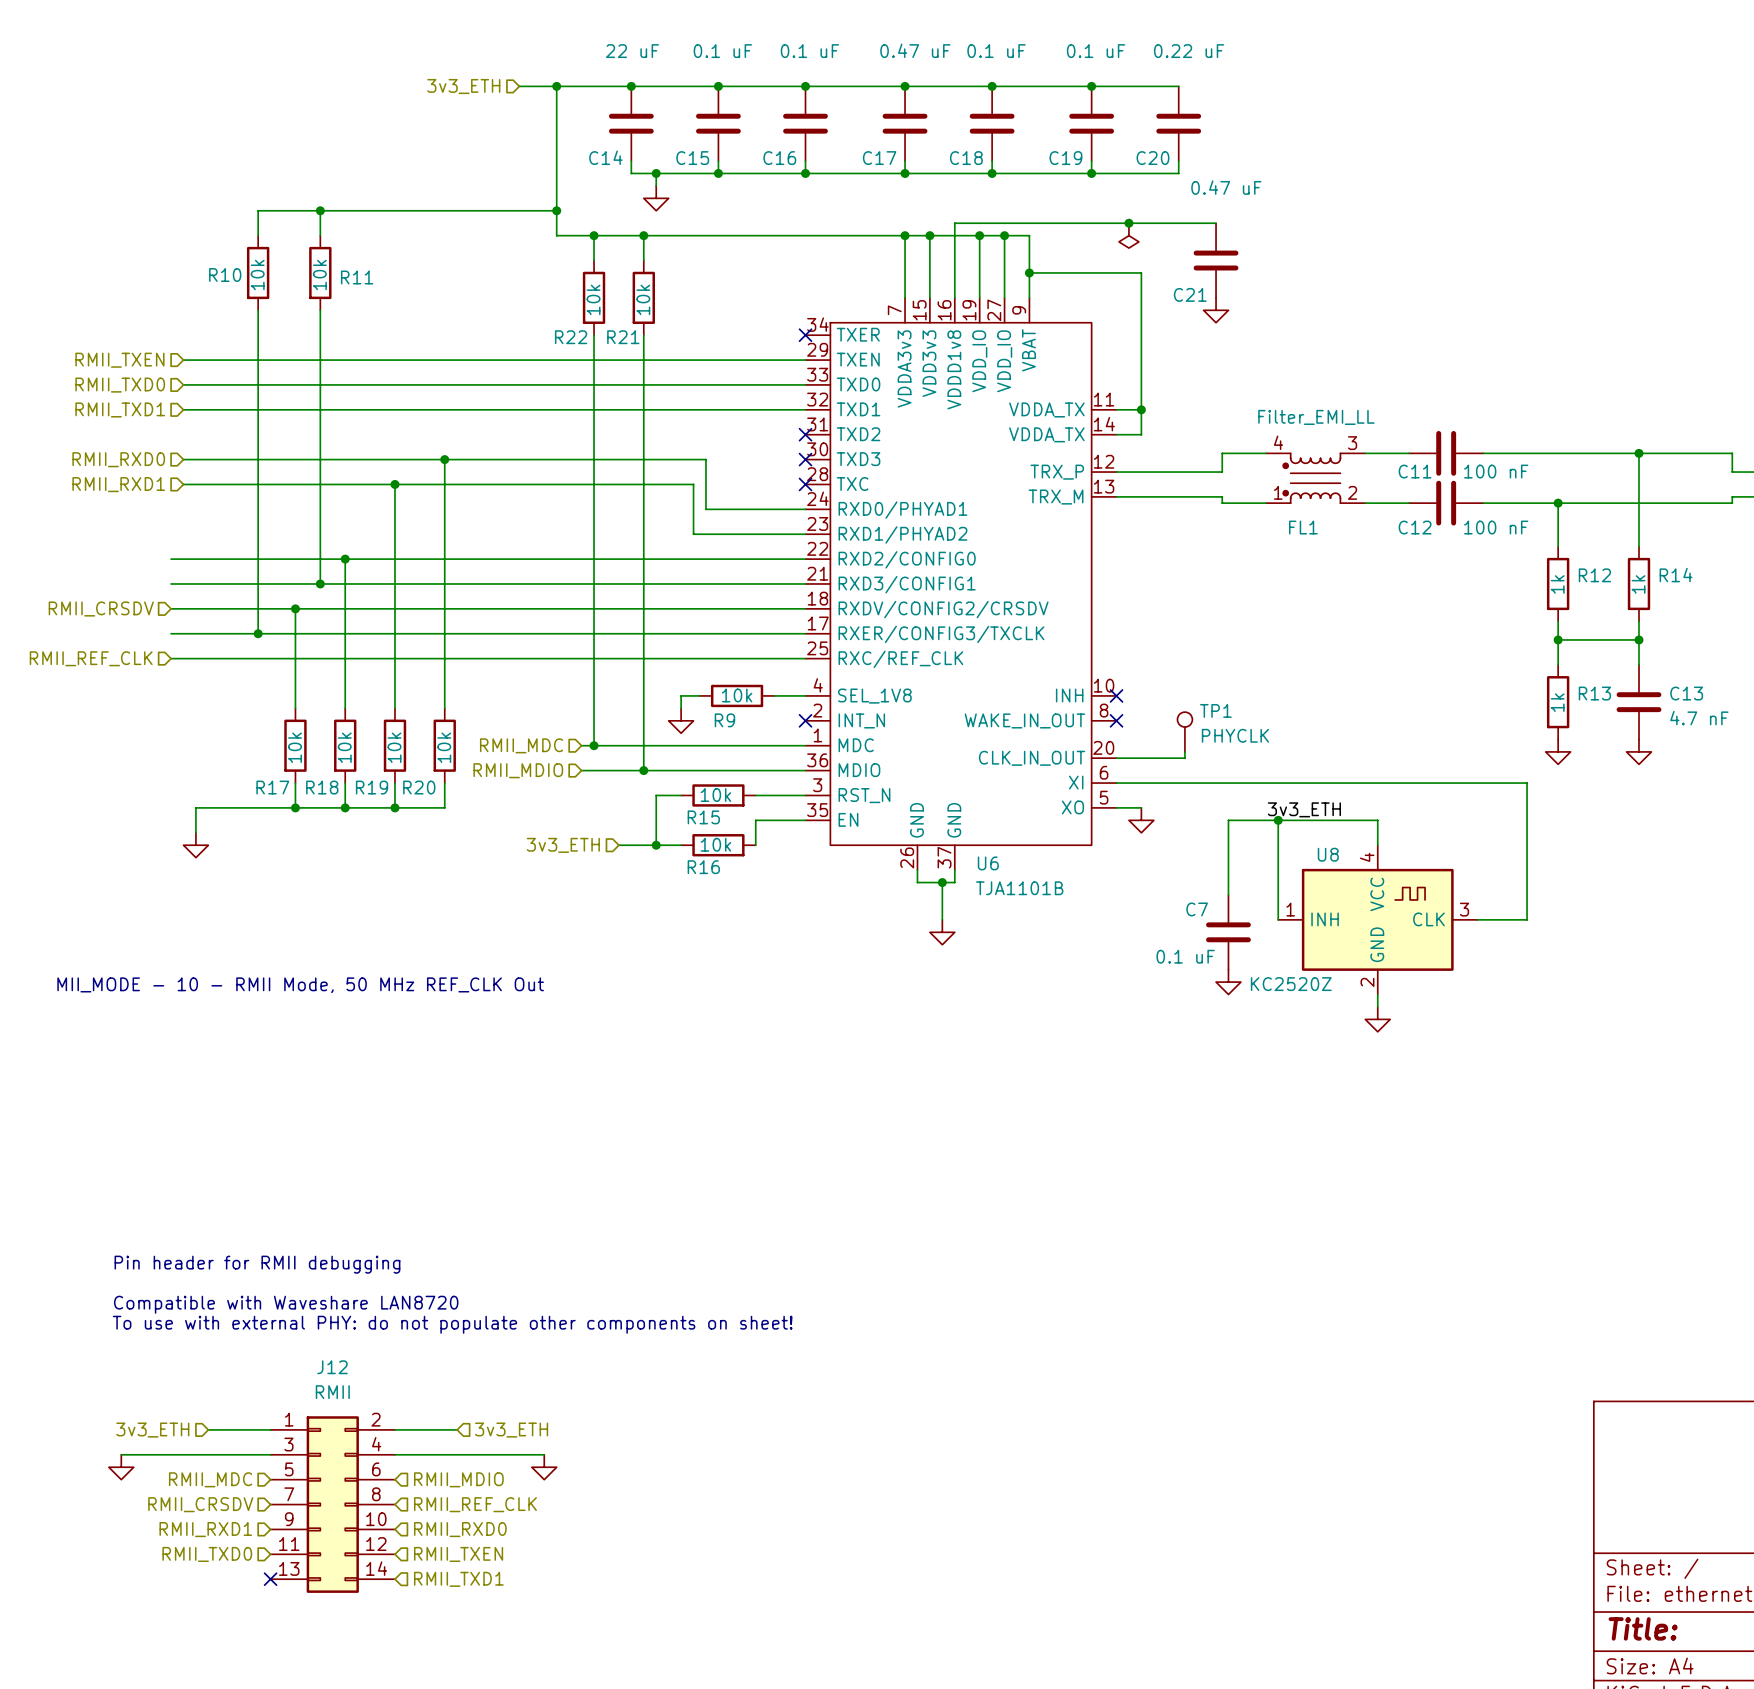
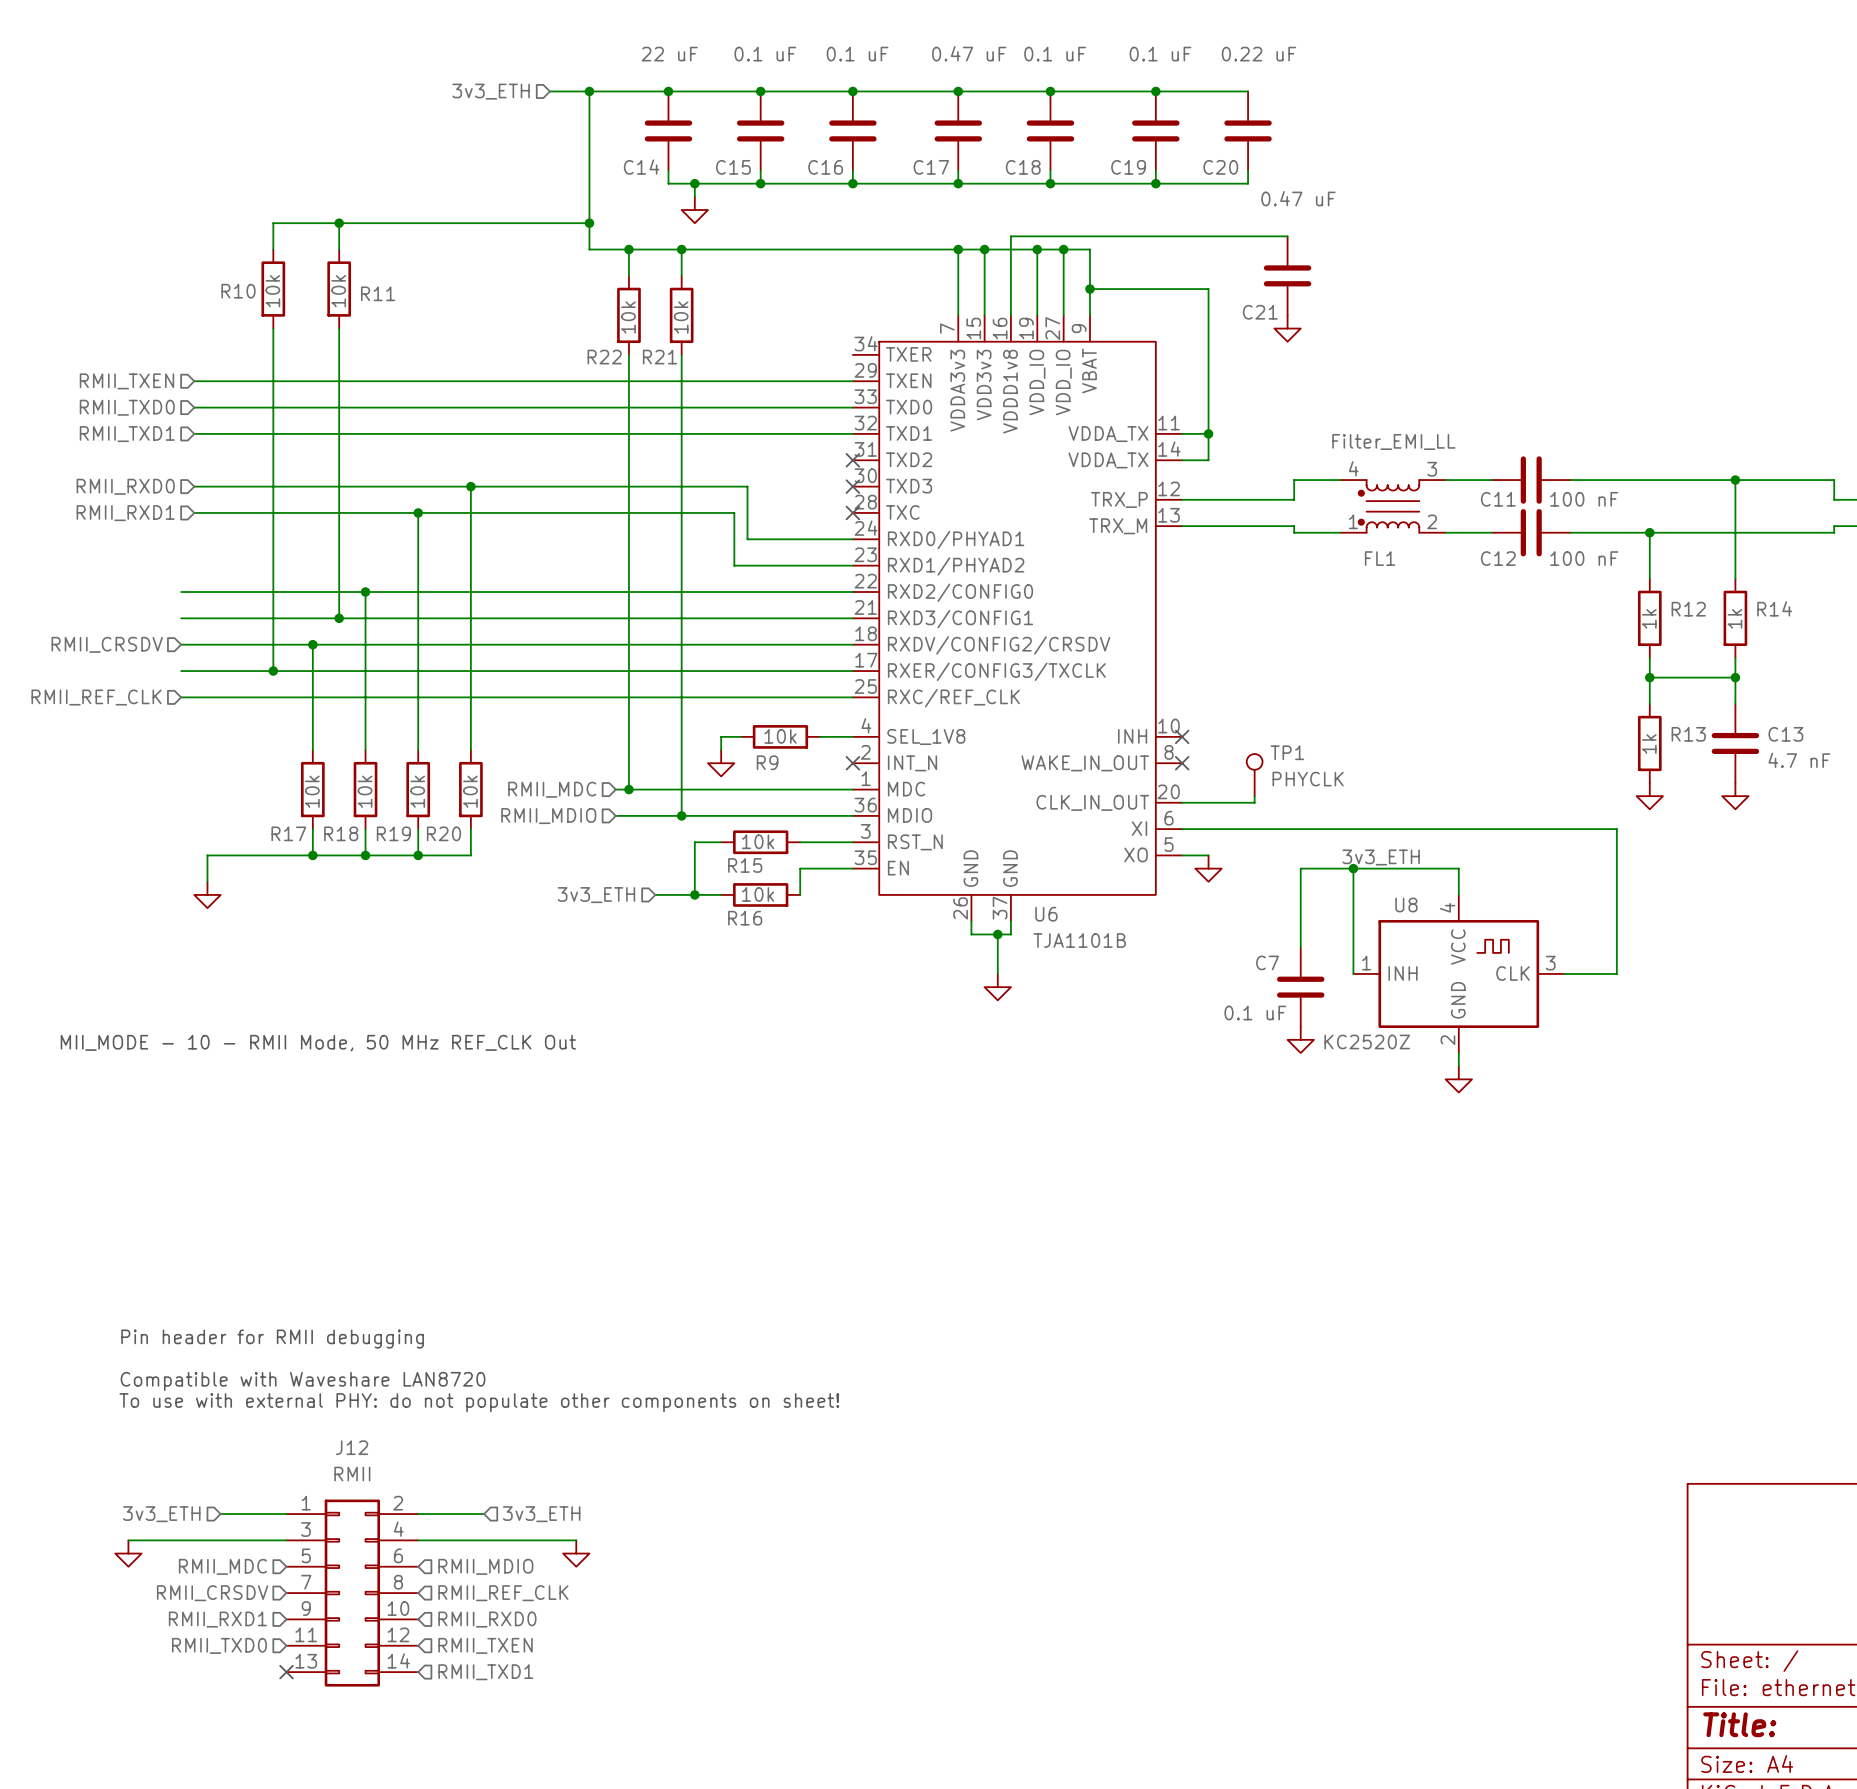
junction: (1128, 223) -> none
power symbol: (1128, 235) -> none
no-connect mark: (805, 335) -> none

